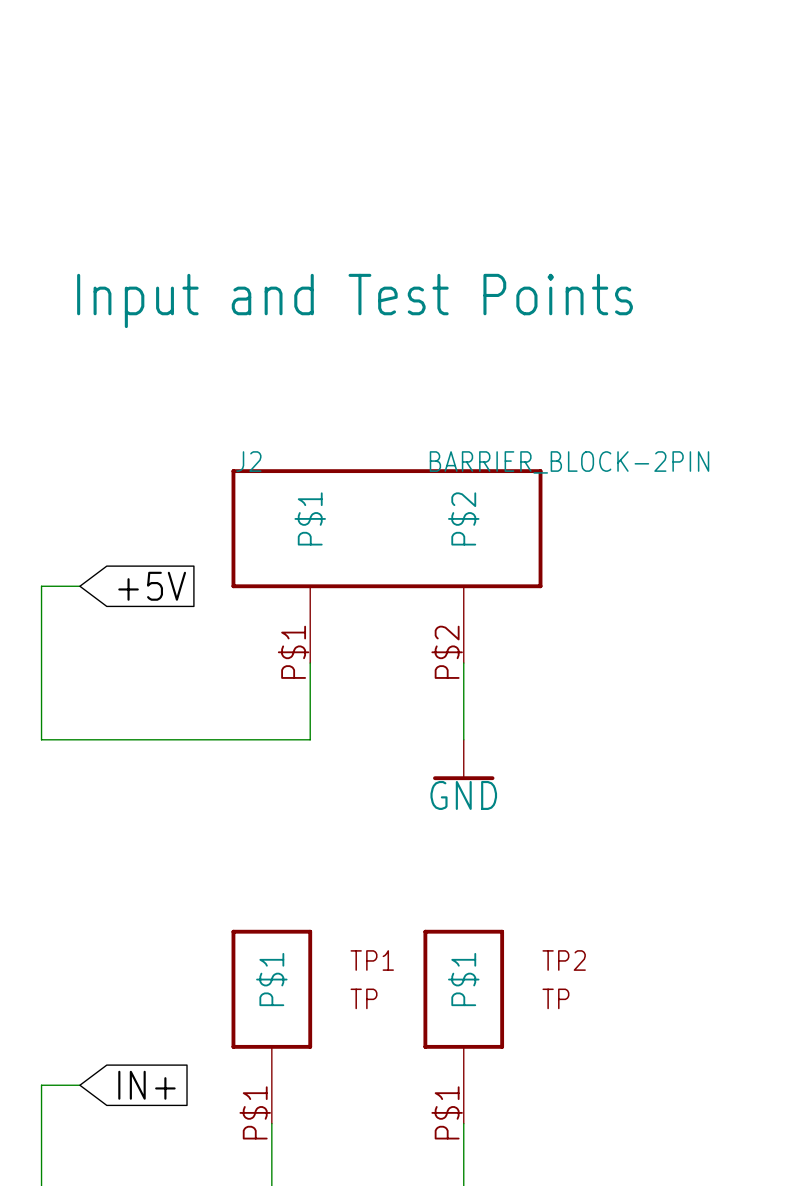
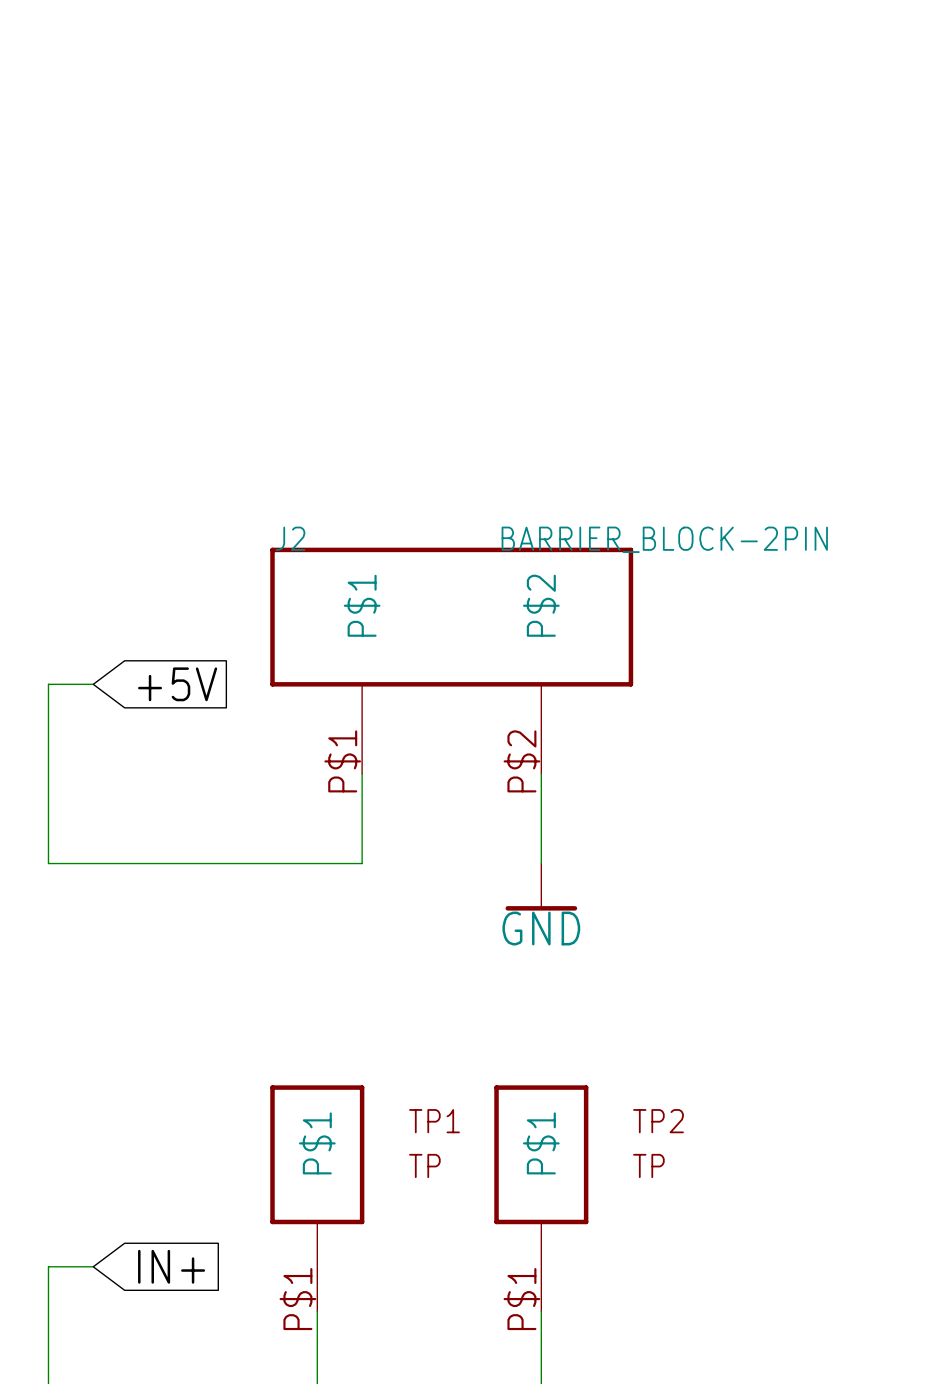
text: Input and Test Points (355, 300) -> none

